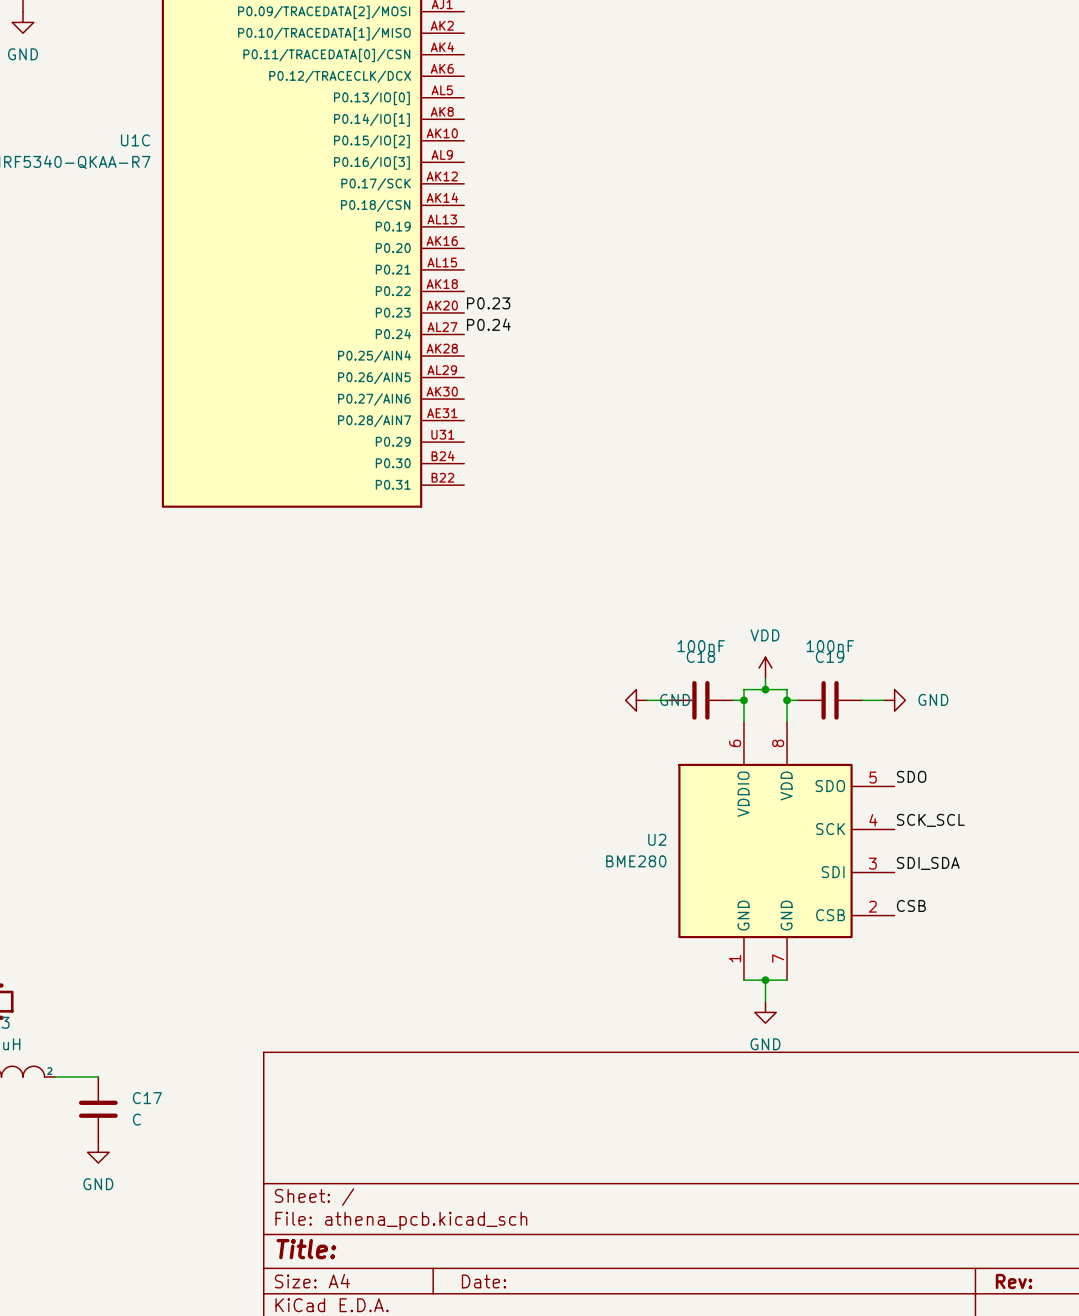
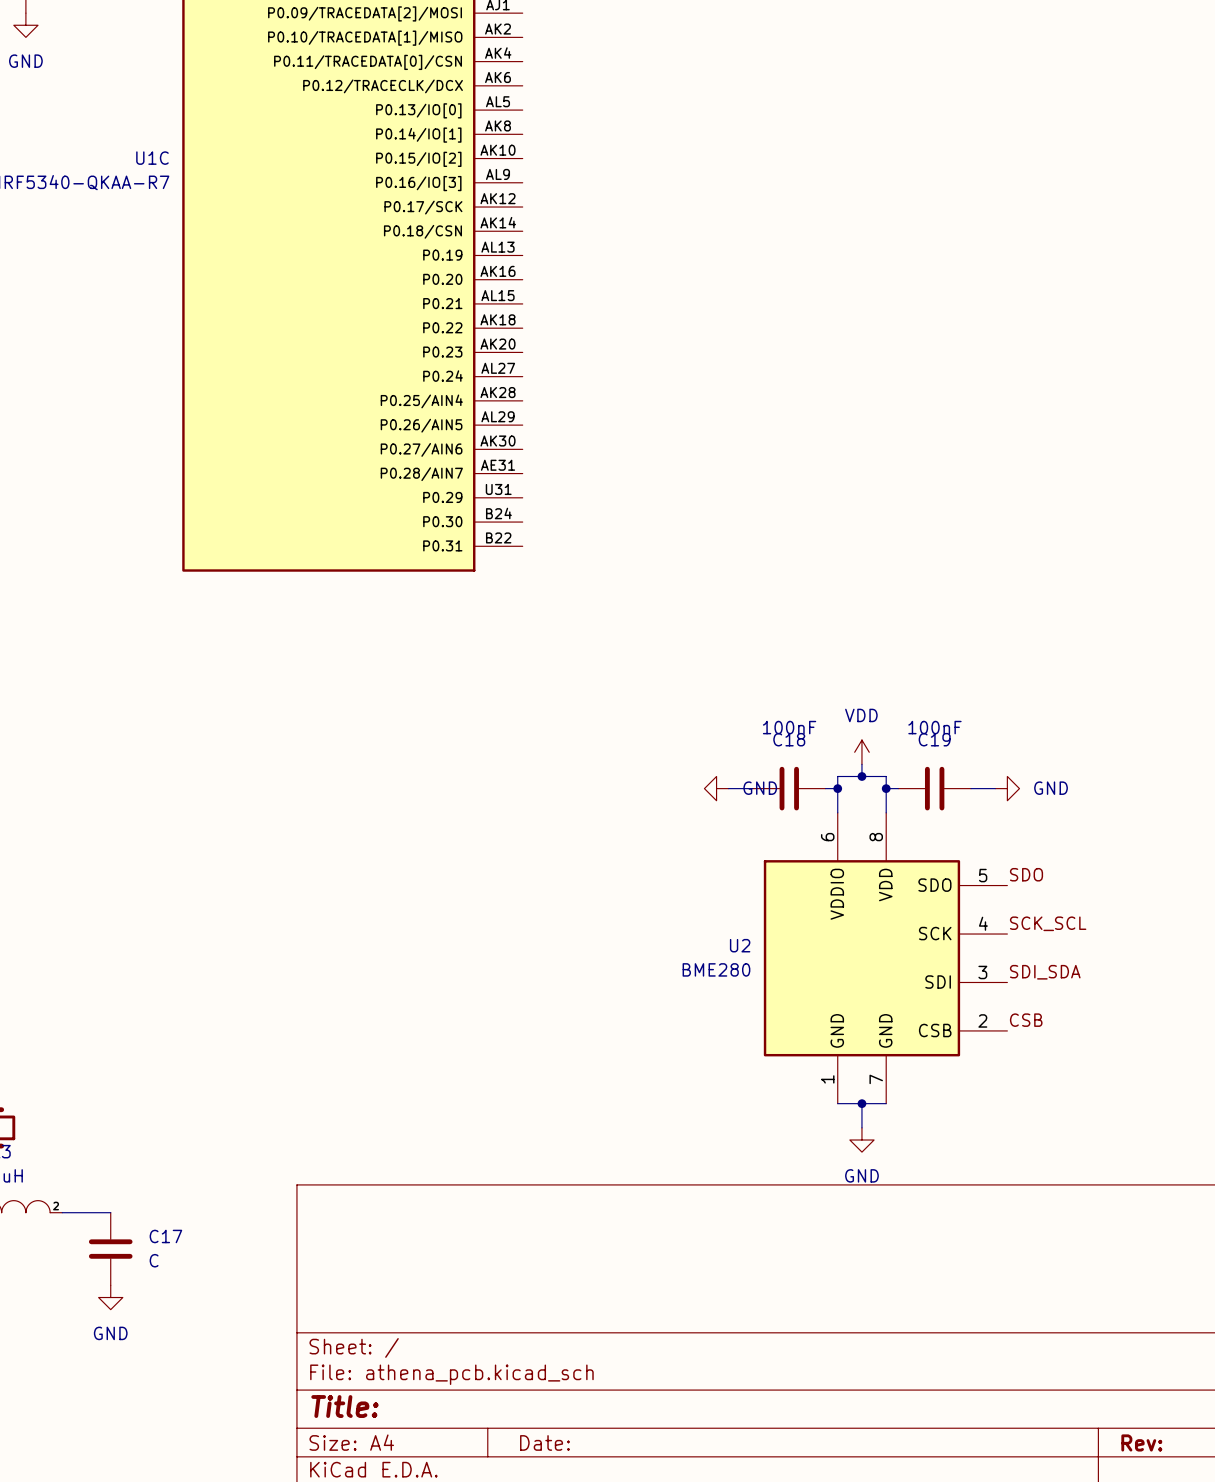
label: P0.23 (488, 303) -> none
label: P0.24 (488, 324) -> none

